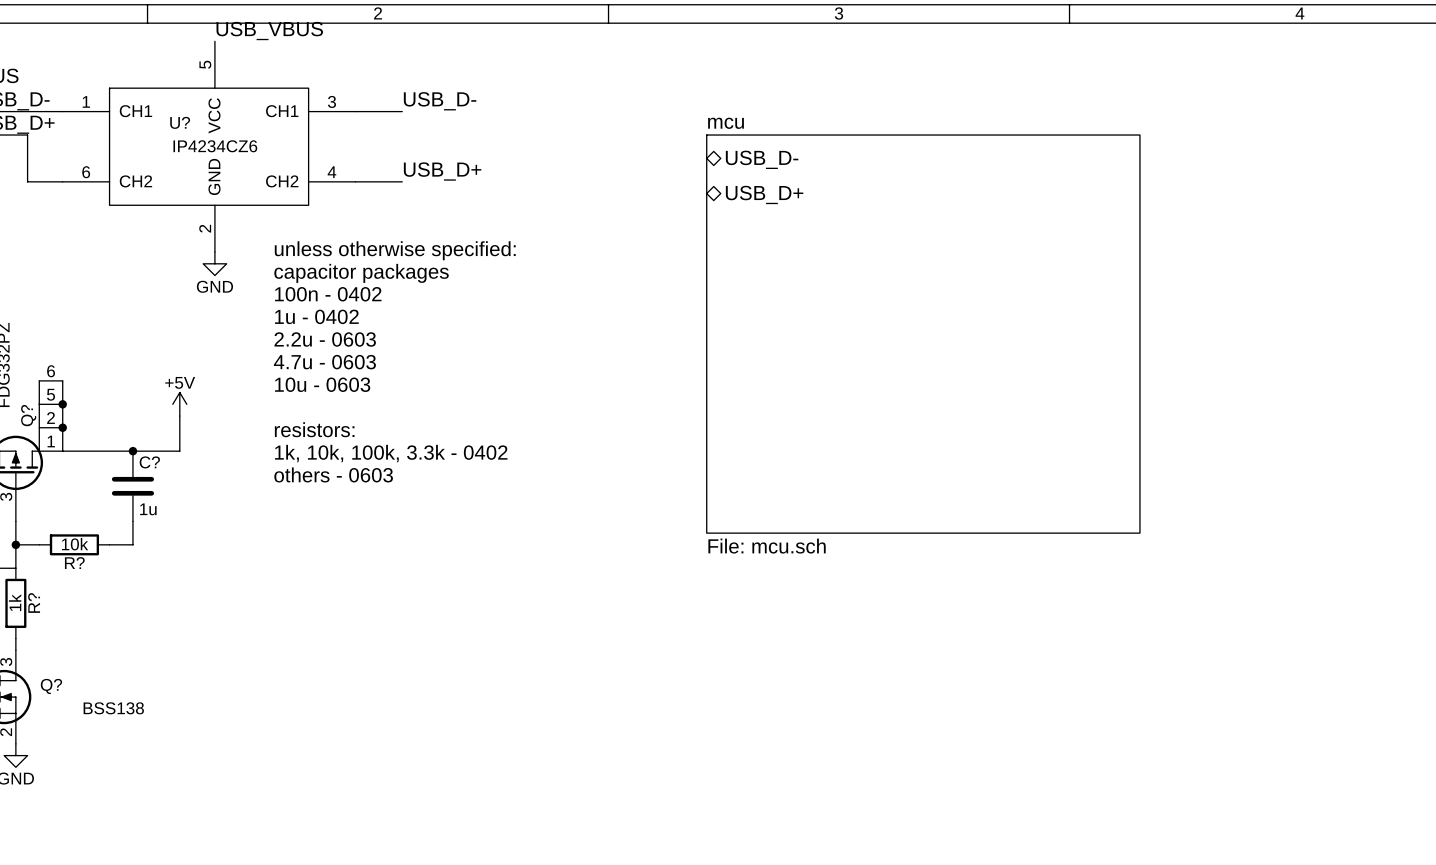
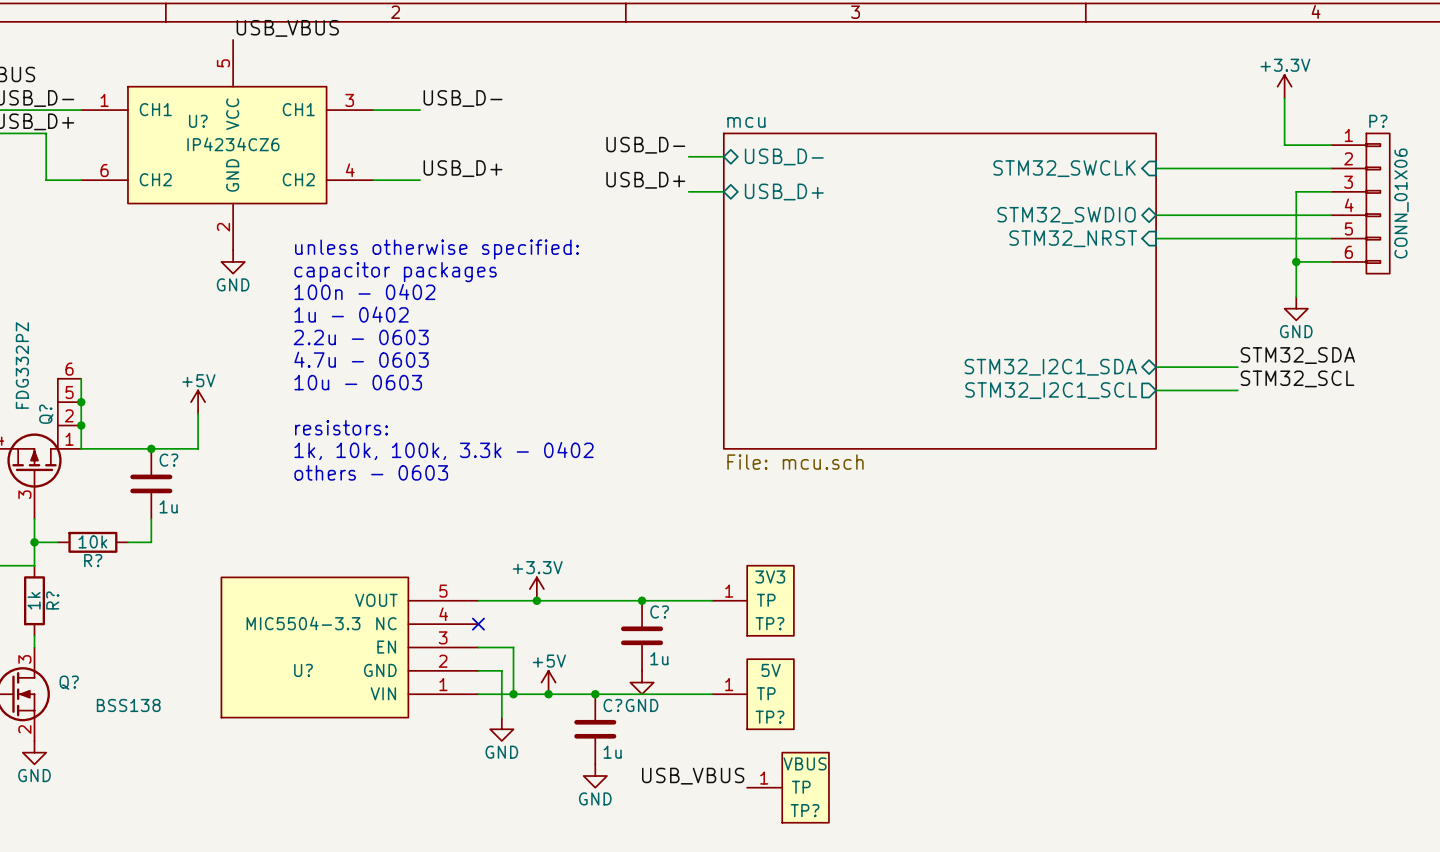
power symbol: none -> +3.3V (1284, 86)
wire: none -> (1284, 98) (1284, 145) (1331, 145)
label: none -> USB_D- (645, 145)
wire: none -> (688, 156) (723, 156)
wire: none -> (1156, 168) (1331, 168)
sheet pin: none -> STM32_SWCLK (1064, 168)
label: none -> USB_D+ (645, 180)
wire: none -> (688, 191) (723, 191)
wire: none -> (1331, 191) (1296, 191) (1296, 297)
P?: none -> CONN_01X06 (1360, 203)
wire: none -> (1156, 215) (1331, 215)
sheet pin: none -> STM32_SWDIO (1066, 215)
wire: none -> (1156, 238) (1331, 238)
sheet pin: none -> STM32_NRST (1073, 238)
wire: none -> (1296, 261) (1331, 261)
junction: none -> (1296, 261)
sheet mcu: none -> File: mcu.sch (939, 291)
power symbol: none -> GND (1296, 308)
sheet mcu: File: mcu.sch (923, 334) -> none
label: none -> STM32_SDA (1297, 355)
wire: none -> (1156, 367) (1237, 367)
sheet pin: none -> STM32_I2C1_SDA (1050, 367)
label: none -> STM32_SCL (1297, 378)
wire: none -> (1156, 390) (1237, 390)
sheet pin: none -> STM32_I2C1_SCL (1051, 390)
power symbol: none -> +3.3V (536, 589)
wire: none -> (478, 600) (712, 600)
junction: none -> (536, 600)
junction: none -> (642, 600)
TP?: none -> 3V3 (753, 600)
no-connect mark: none -> (478, 624)
C?: none -> 1u (642, 635)
U?: none -> MIC5504-3.3 (349, 647)
wire: none -> (478, 647) (513, 647) (513, 694)
wire: none -> (478, 670) (501, 670) (501, 717)
power symbol: none -> +5V (548, 682)
power symbol: none -> GND (642, 682)
wire: none -> (478, 694) (712, 694)
junction: none -> (513, 694)
junction: none -> (548, 694)
junction: none -> (595, 694)
TP?: none -> 5V (753, 694)
power symbol: none -> GND (501, 729)
C?: none -> 1u (595, 729)
power symbol: none -> GND (595, 776)
label: none -> USB_VBUS (693, 776)
TP?: none -> VBUS (788, 787)

